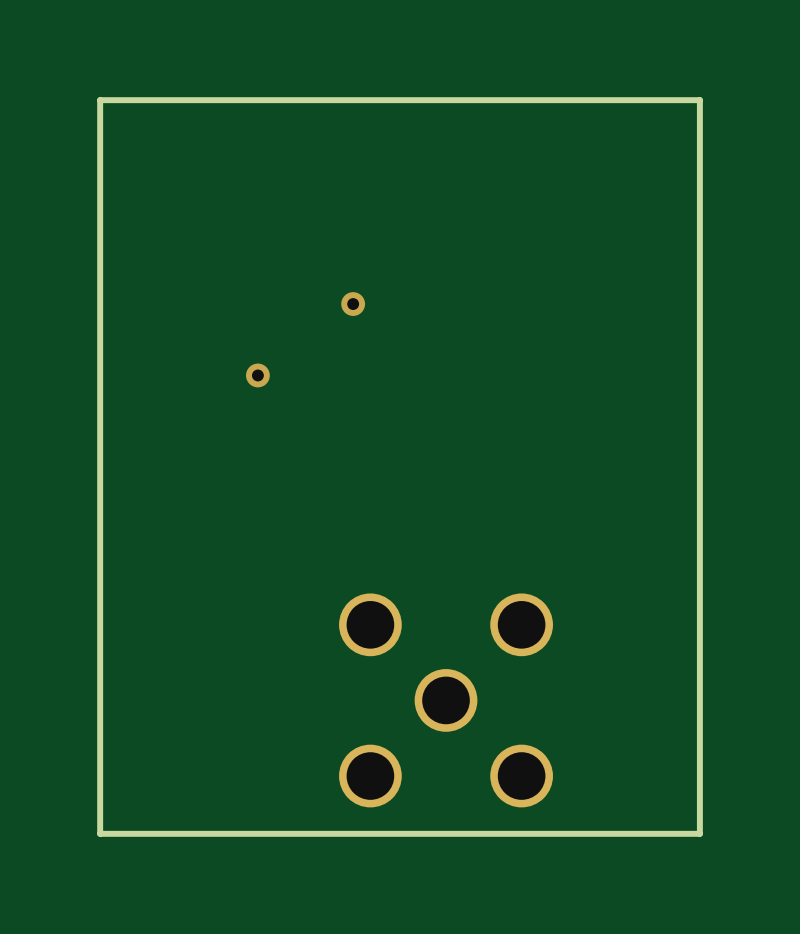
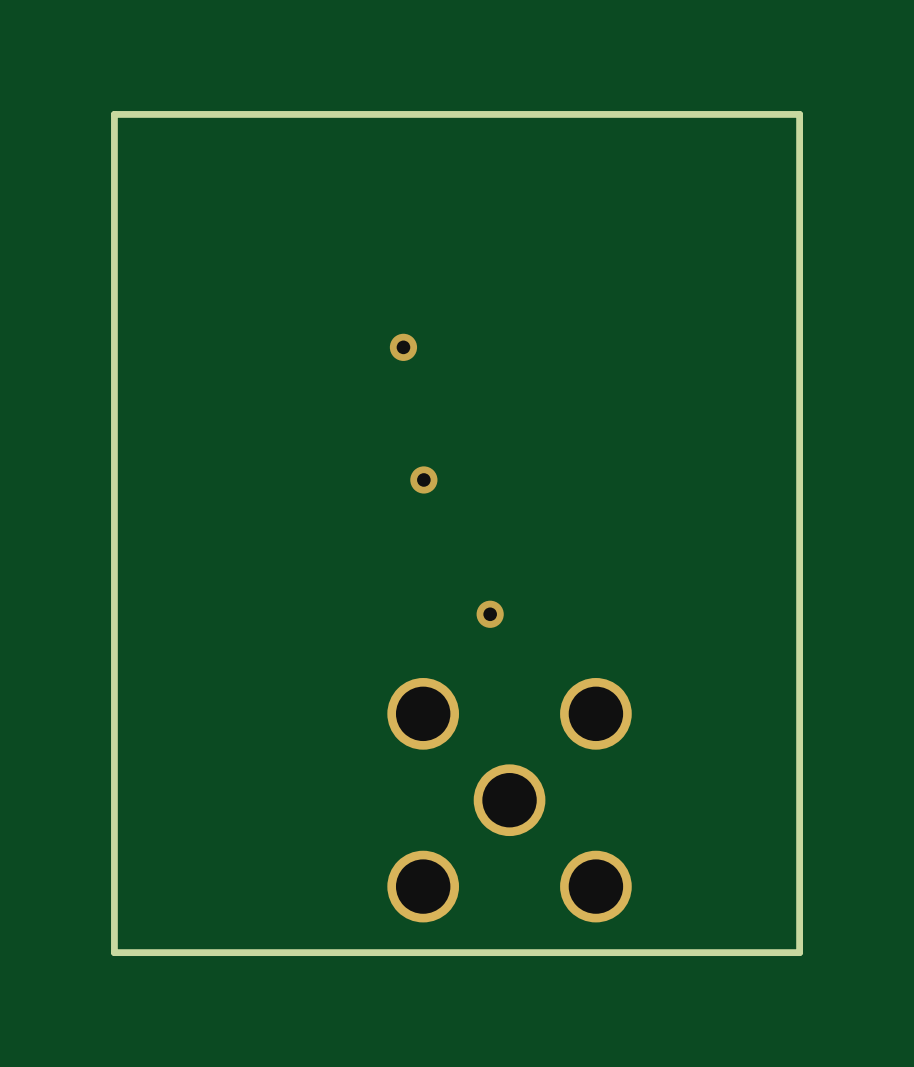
via: (257, 375) -> none
via: none -> (423, 479)
via: none -> (490, 614)

